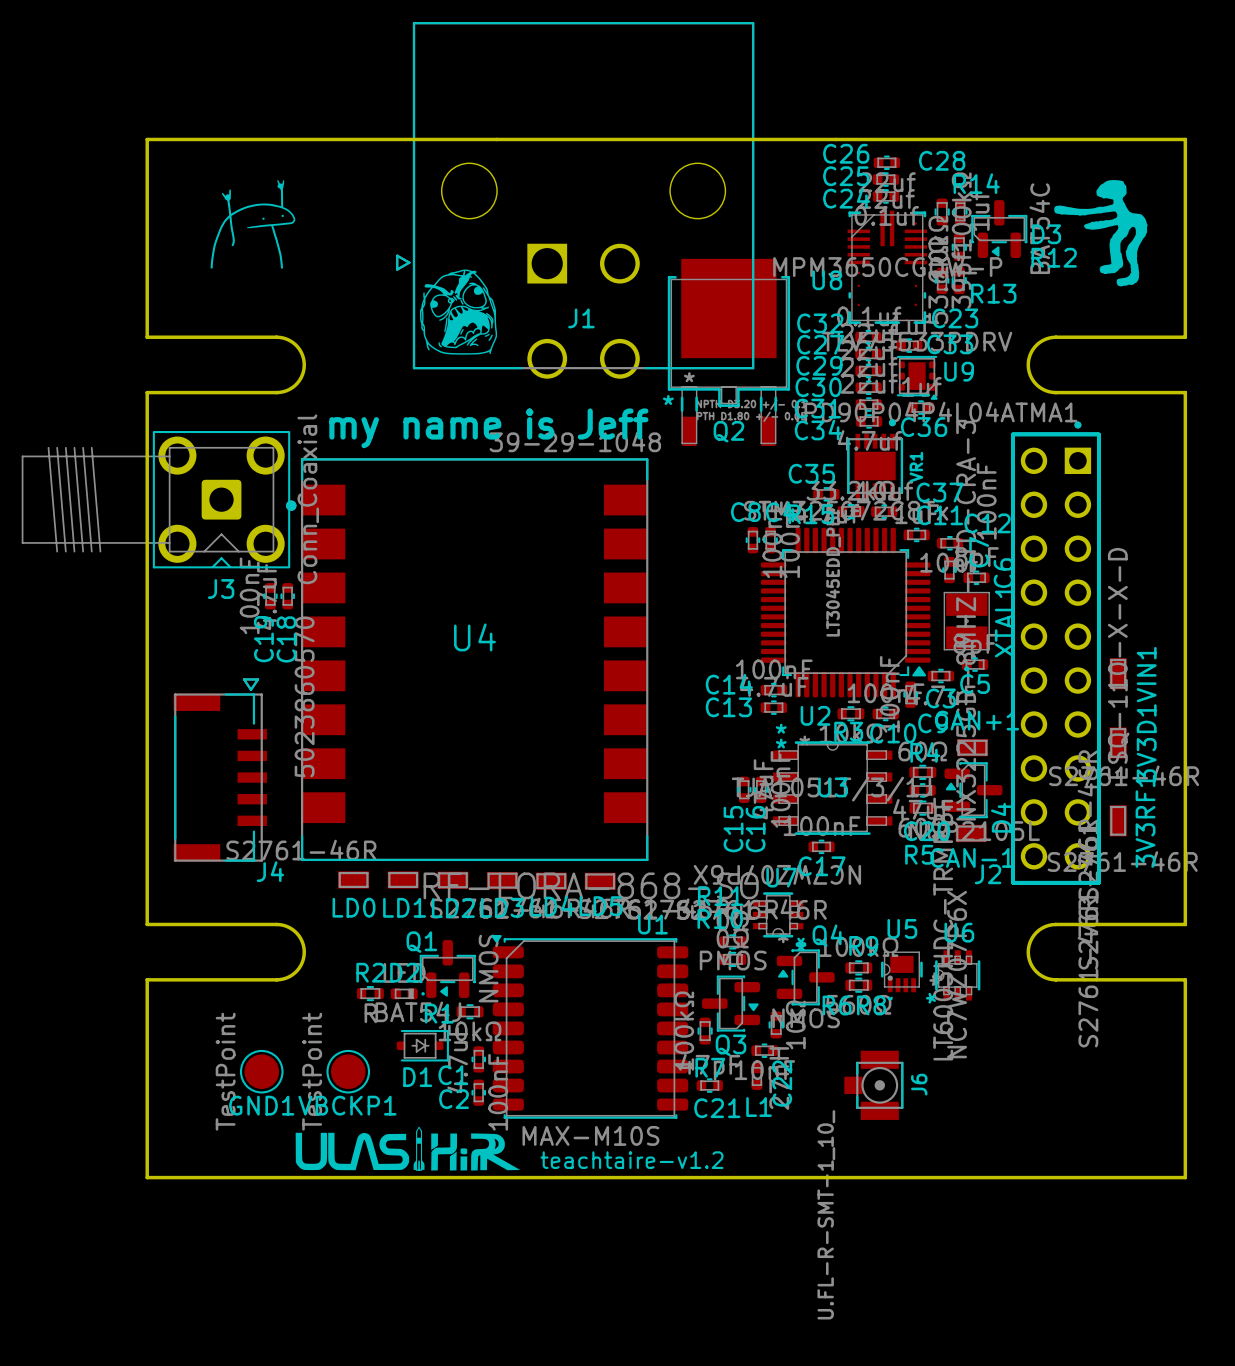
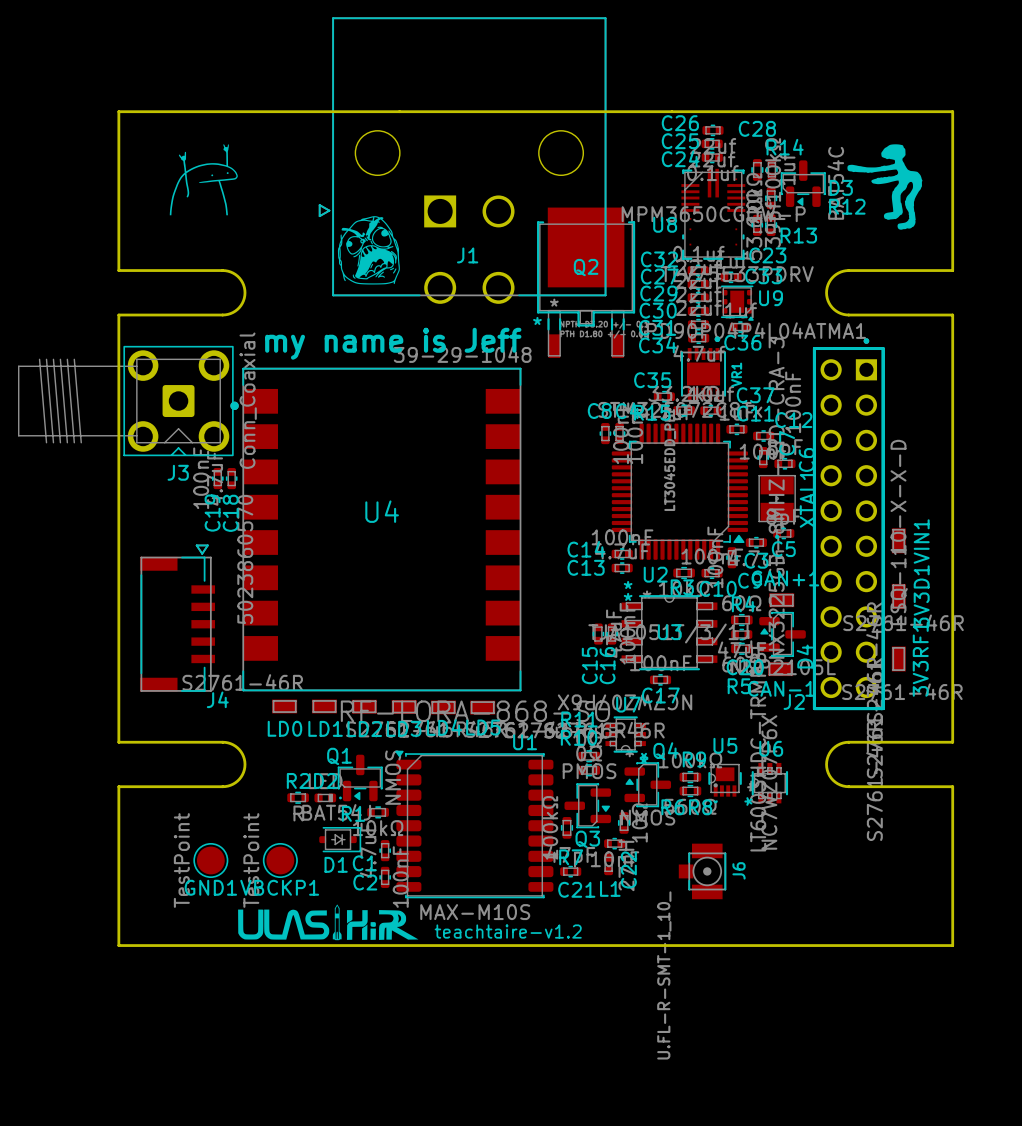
Q2 name position: Q2 (728, 431) -> Q2 (586, 267)

